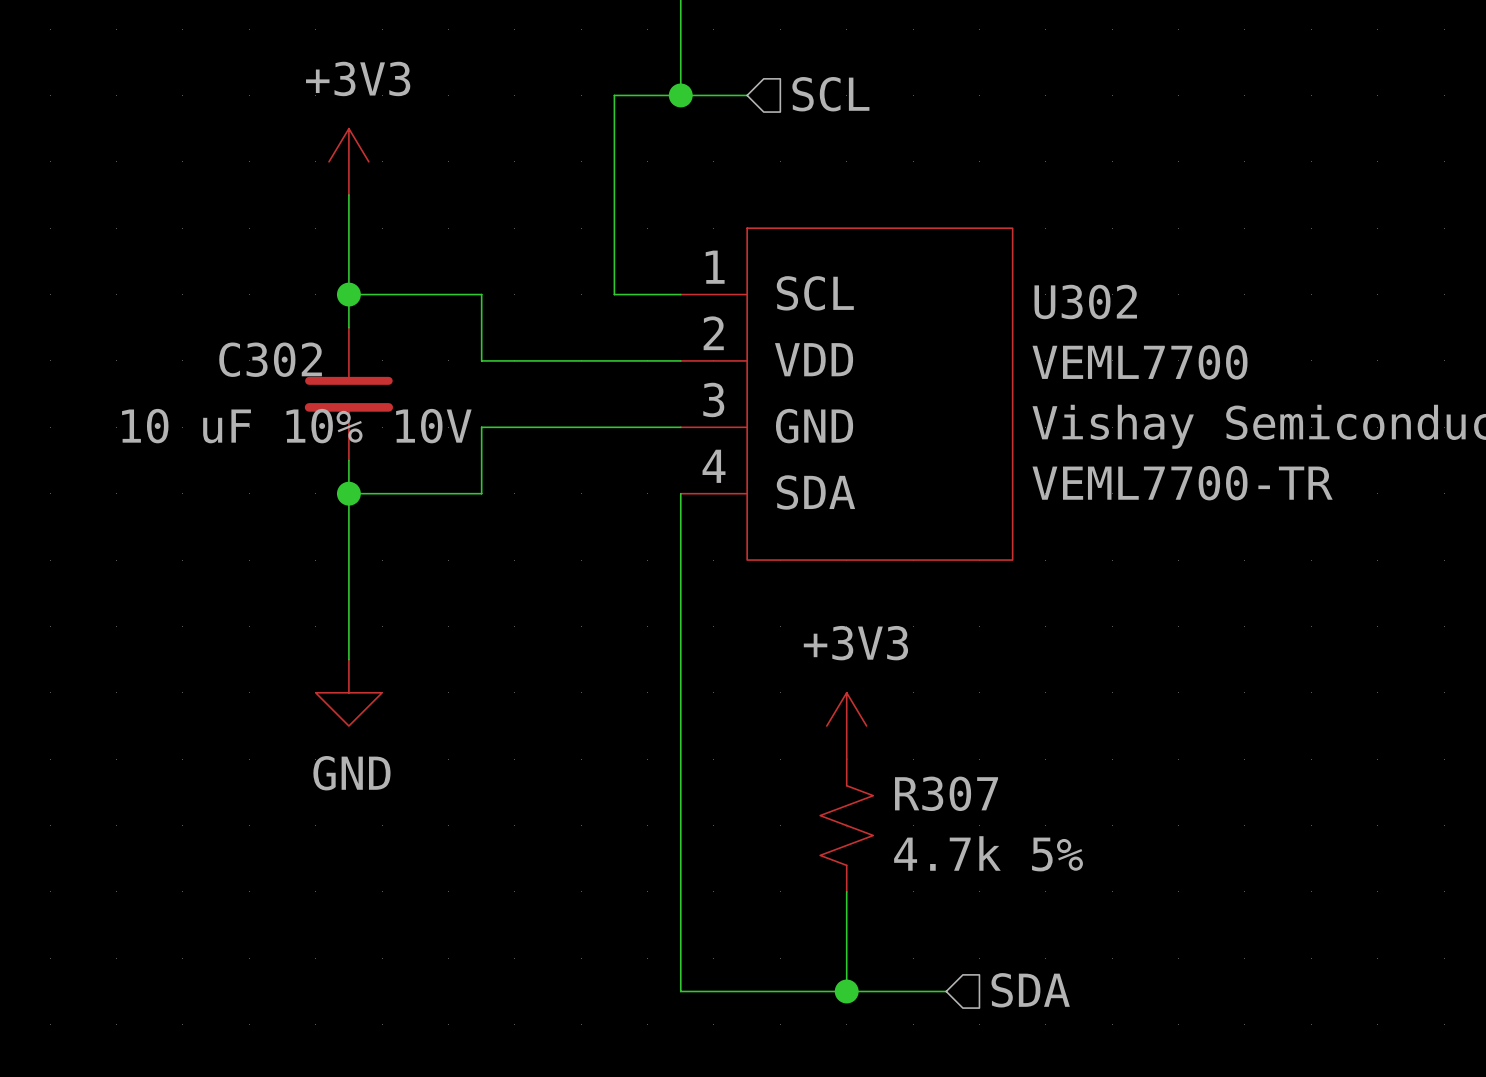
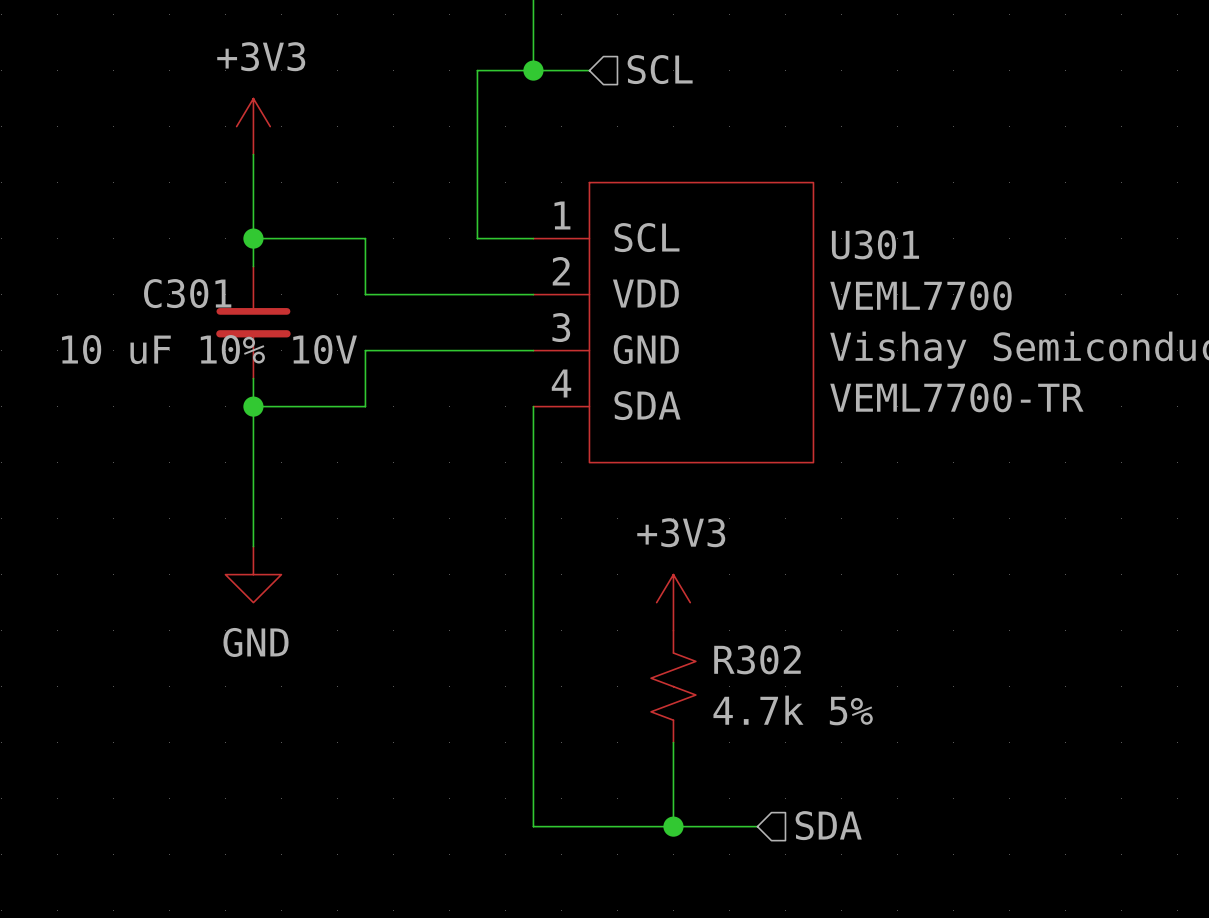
U302 name: U302 (1085, 301) -> U301 (875, 244)
C302 name: C302 (270, 359) -> C301 (187, 293)
R307 name: R307 (946, 793) -> R302 (757, 659)

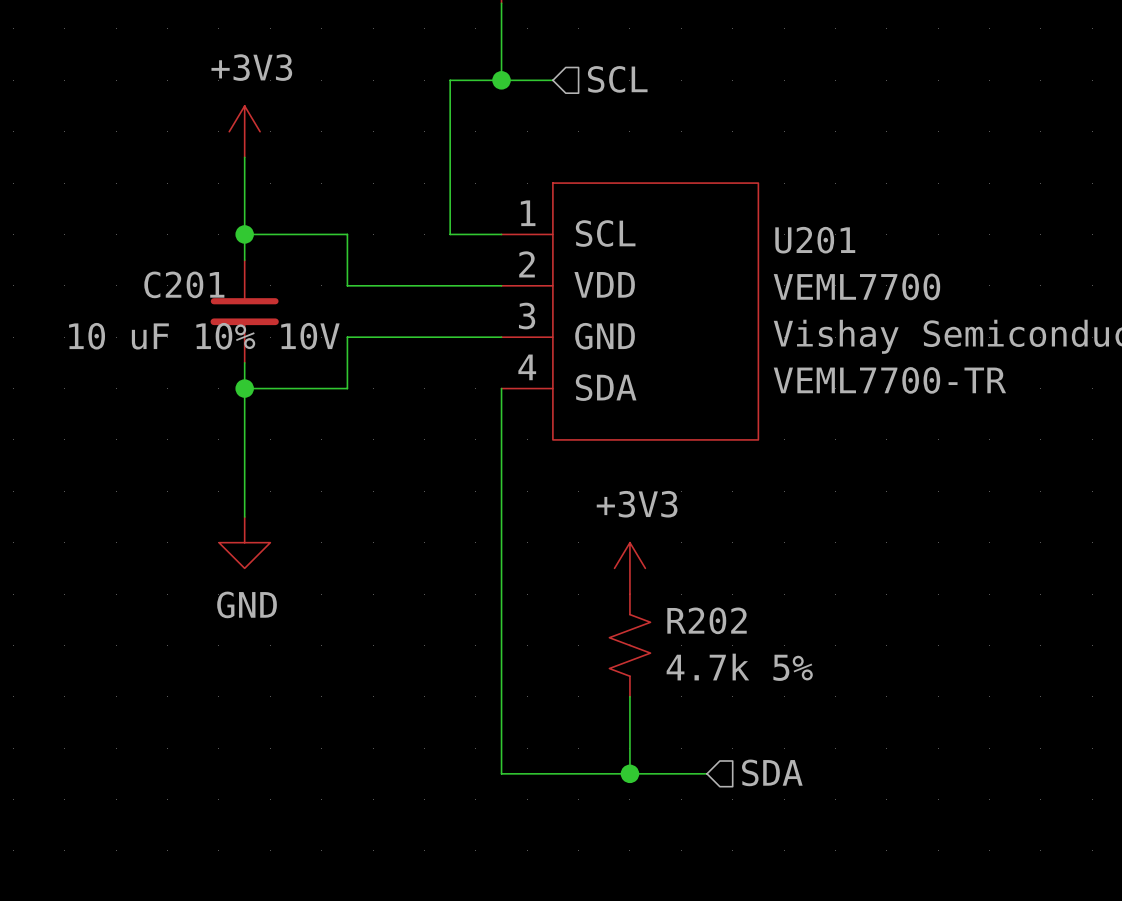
U301 name: U301 (875, 244) -> U201 (815, 240)
C301 name: C301 (187, 293) -> C201 (184, 284)
R302 name: R302 (757, 659) -> R202 (707, 620)

